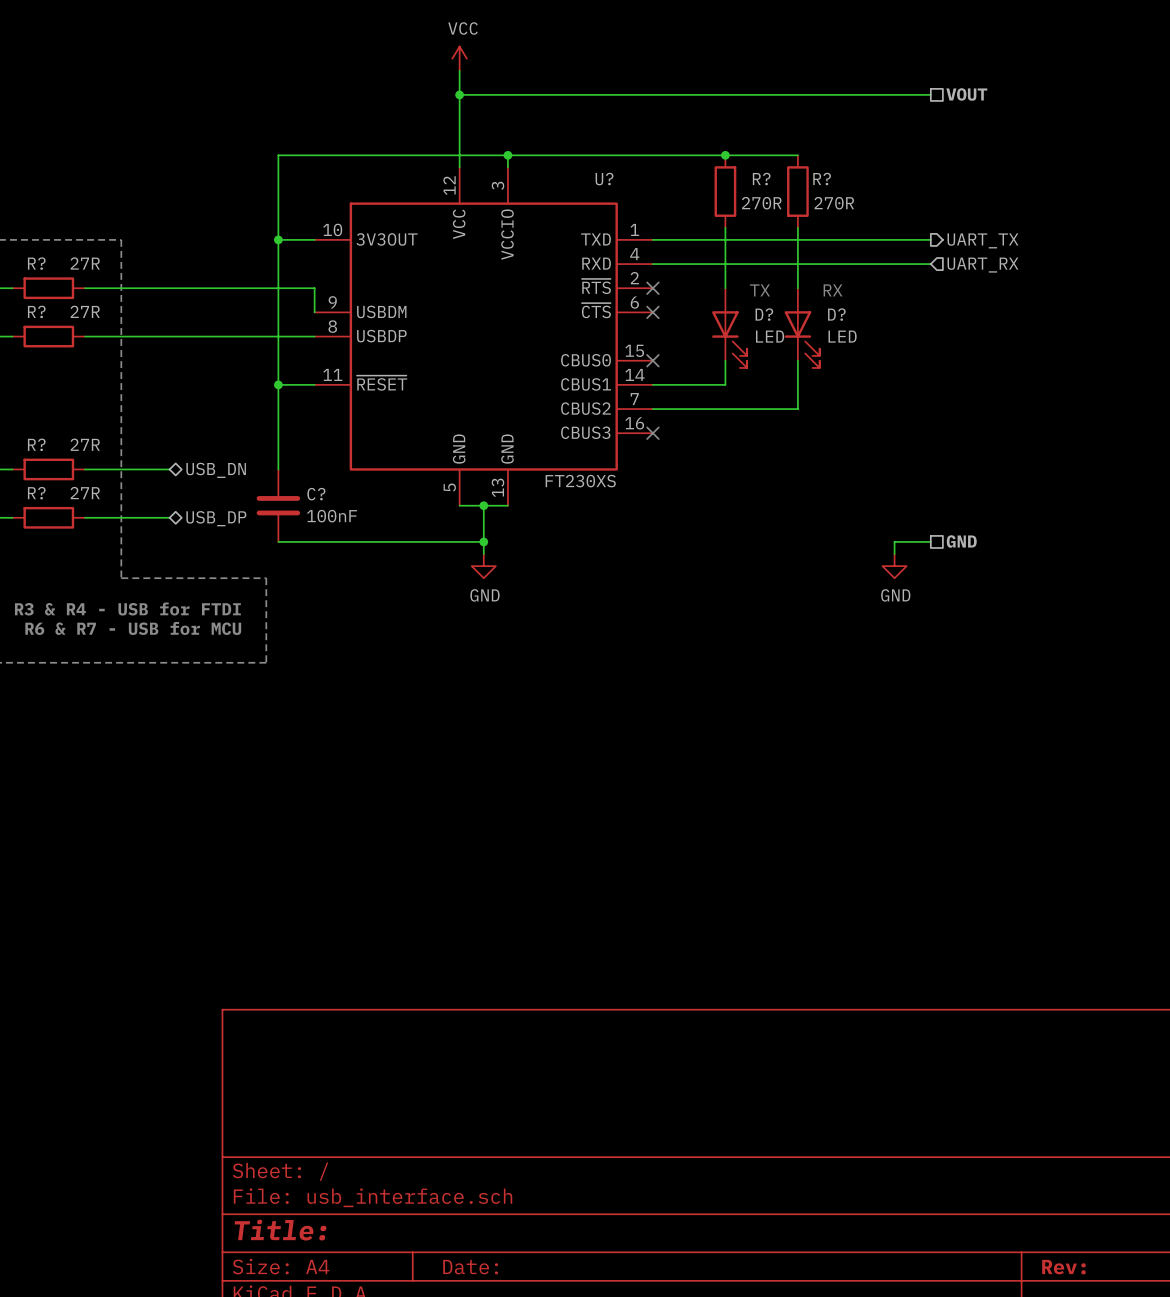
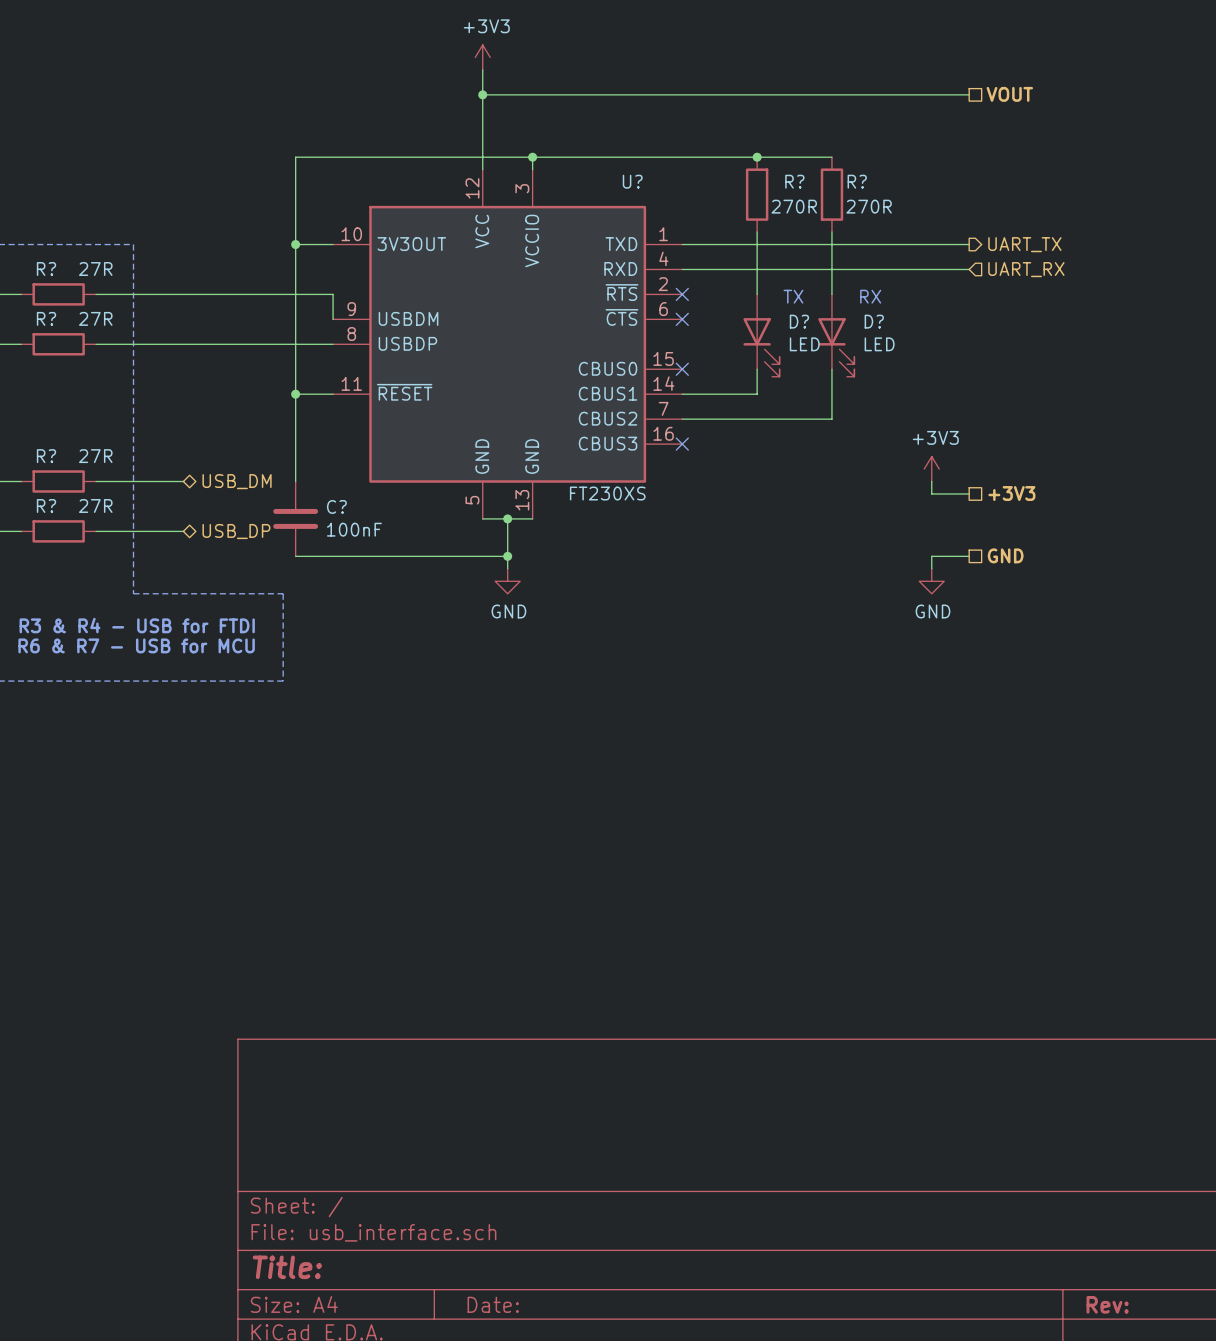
power symbol: VCC (459, 58) -> +3V3 (482, 57)
power symbol: none -> +3V3 (931, 469)
wire: none -> (931, 481) (931, 493) (969, 493)
hierarchical label: USB_DN (216, 470) -> USB_DM (237, 481)
hierarchical label: none -> +3V3 (1011, 493)

